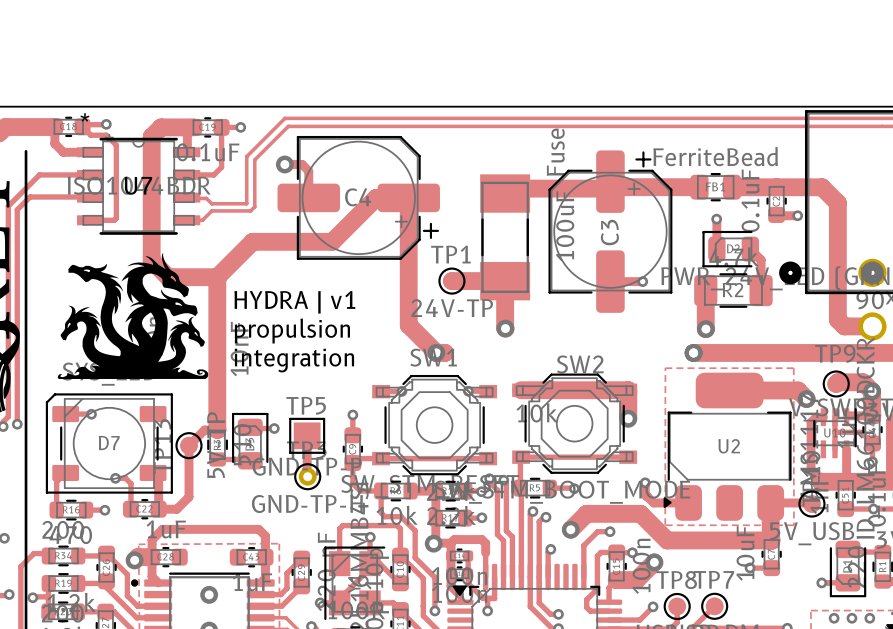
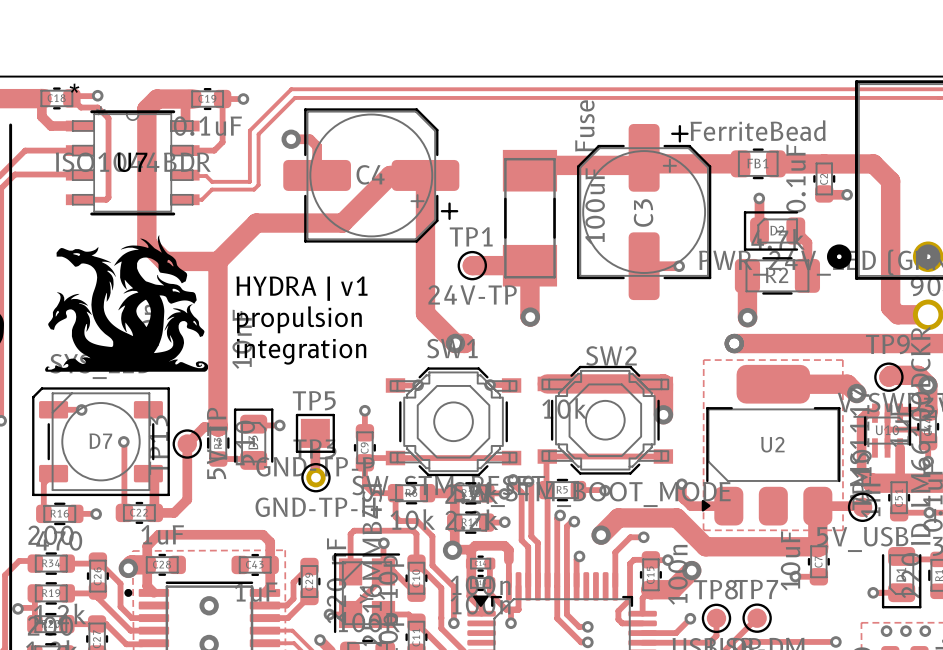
track: (115, 478) (125, 478) (130, 483) -> (123, 441) (124, 485)
via position: (115, 478) -> (123, 441)

